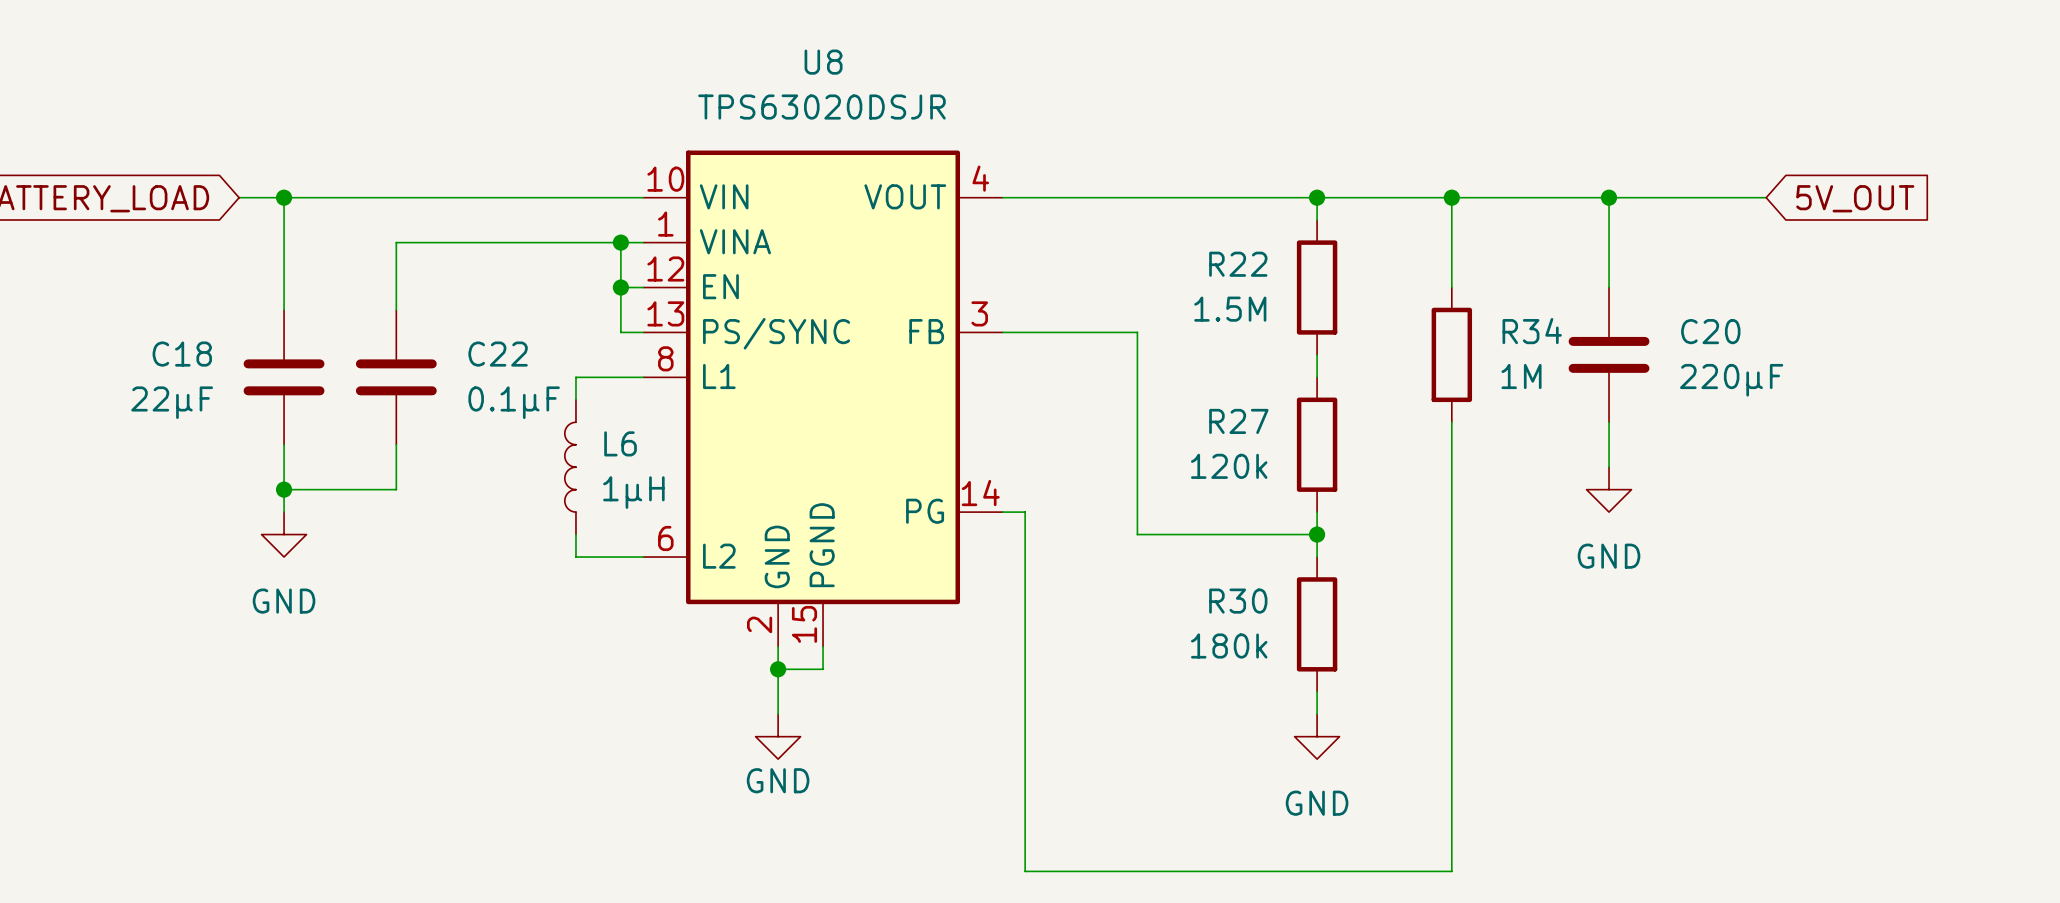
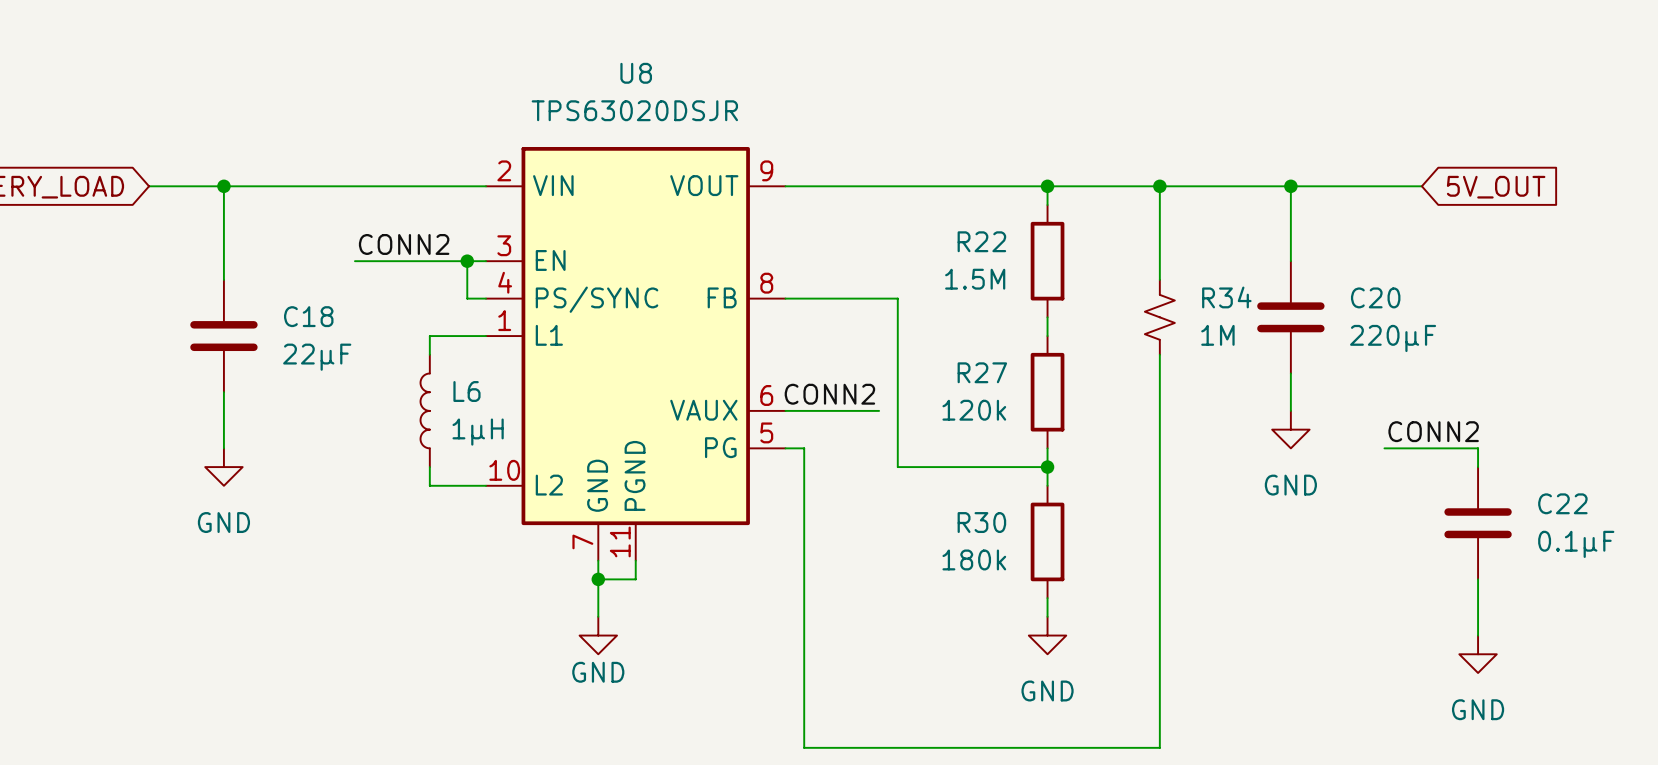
U8 symbol: [643, 150, 1003, 647] -> [485, 146, 786, 561]
wire: (284, 197) (284, 309) -> (223, 186) (223, 279)
junction position: (284, 197) -> (223, 186)
wire: (620, 242) (620, 287) -> (354, 261) (467, 261)
junction: (620, 242) -> none
wire: (643, 242) (396, 242) (396, 309) -> none
label: none -> CONN2 (404, 244)
R34 symbol: [1431, 287, 1473, 423] -> [1144, 279, 1175, 355]
C18 name position: C18 (182, 354) -> C18 (308, 316)
C18 position: (284, 377) -> (223, 336)
C22 position: (396, 377) -> (1478, 523)
C18 value position: 22µF (172, 402) -> 22µF (317, 357)
wire: (284, 444) (284, 512) -> (223, 392) (223, 448)
wire: (396, 444) (396, 489) (284, 489) -> none
label: none -> CONN2 (829, 394)
wire: none -> (785, 410) (879, 410)
junction: (284, 489) -> none
label: none -> CONN2 (1433, 431)
wire: none -> (1384, 448) (1478, 448) (1478, 467)
power symbol position: GND (284, 534) -> GND (223, 467)
wire: none -> (1478, 579) (1478, 635)
power symbol: none -> GND (1478, 654)

